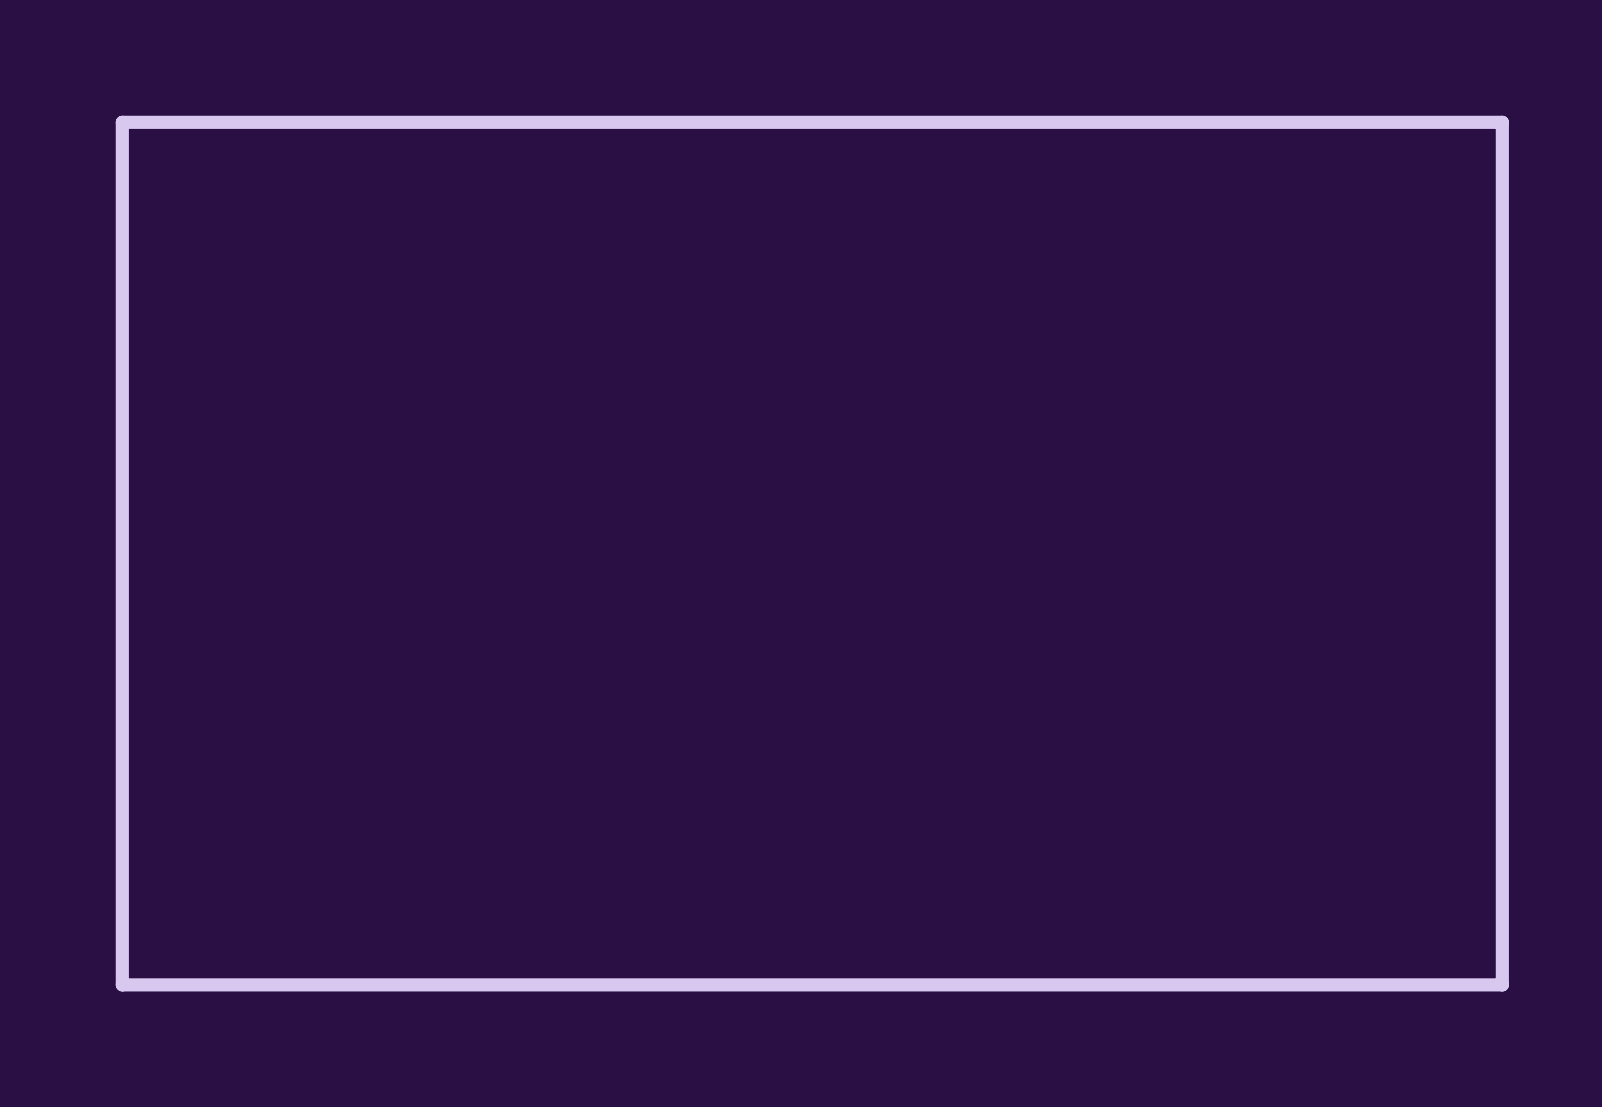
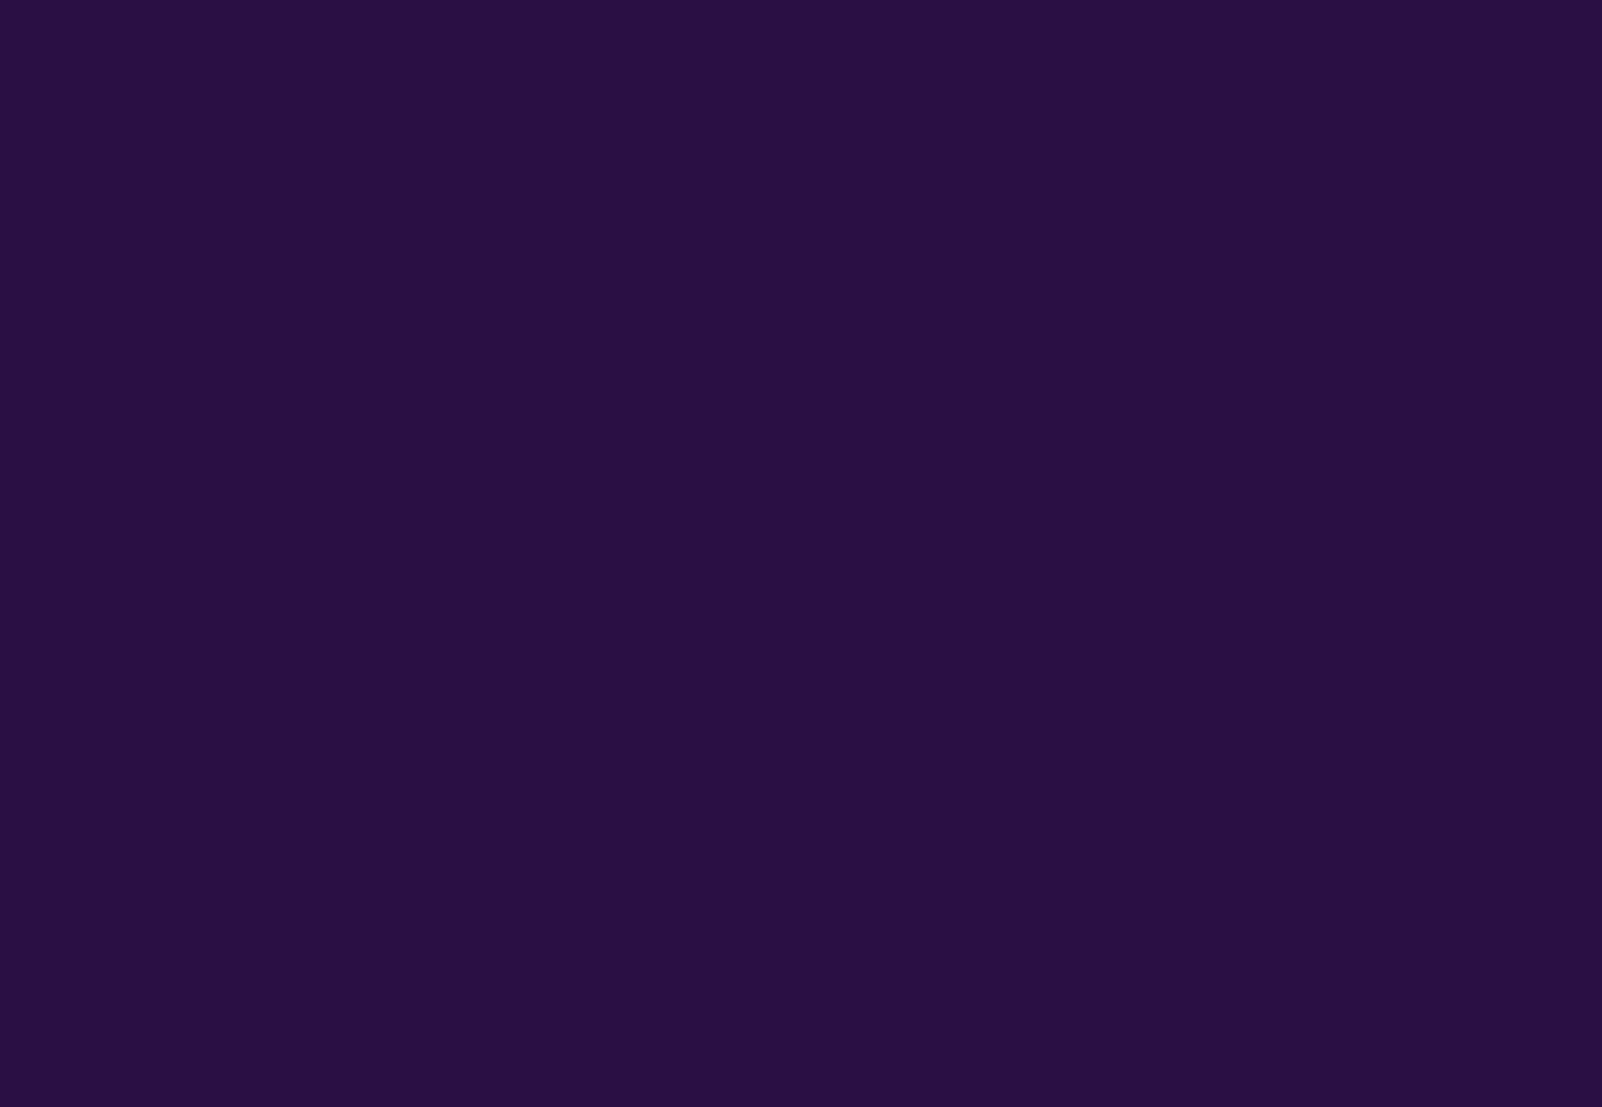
drawing: [115, 115, 1509, 992] -> none

